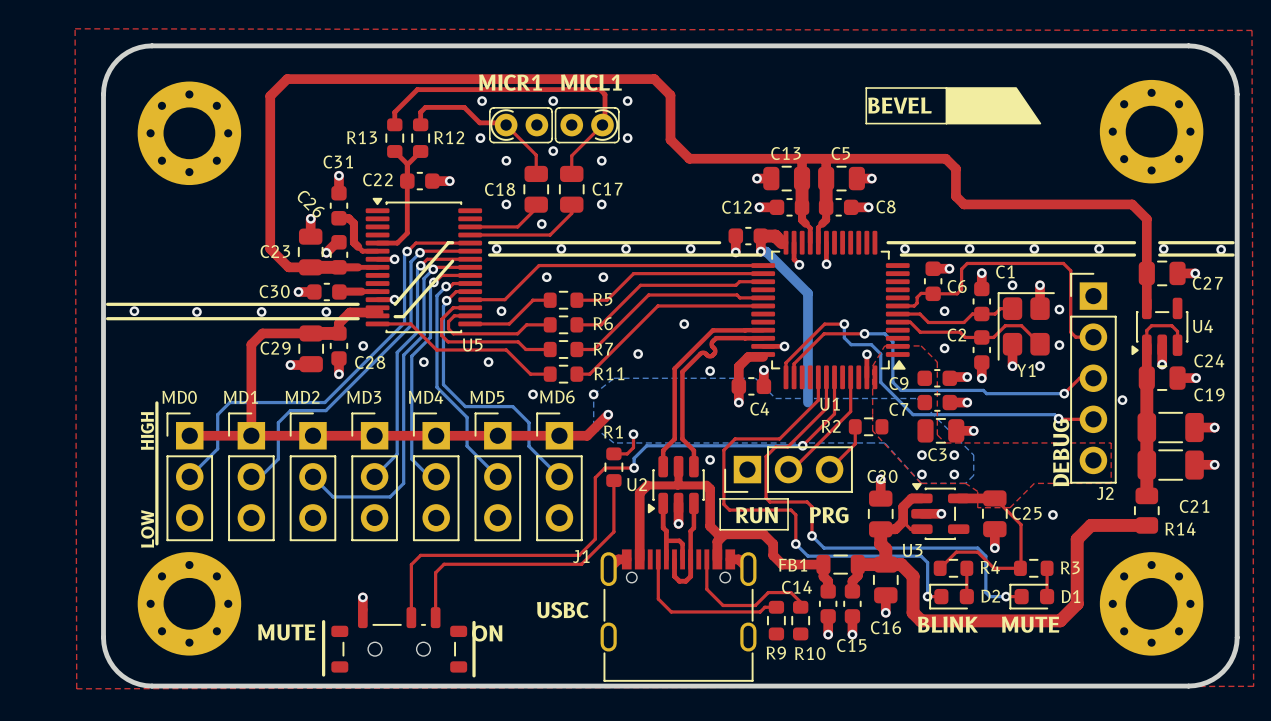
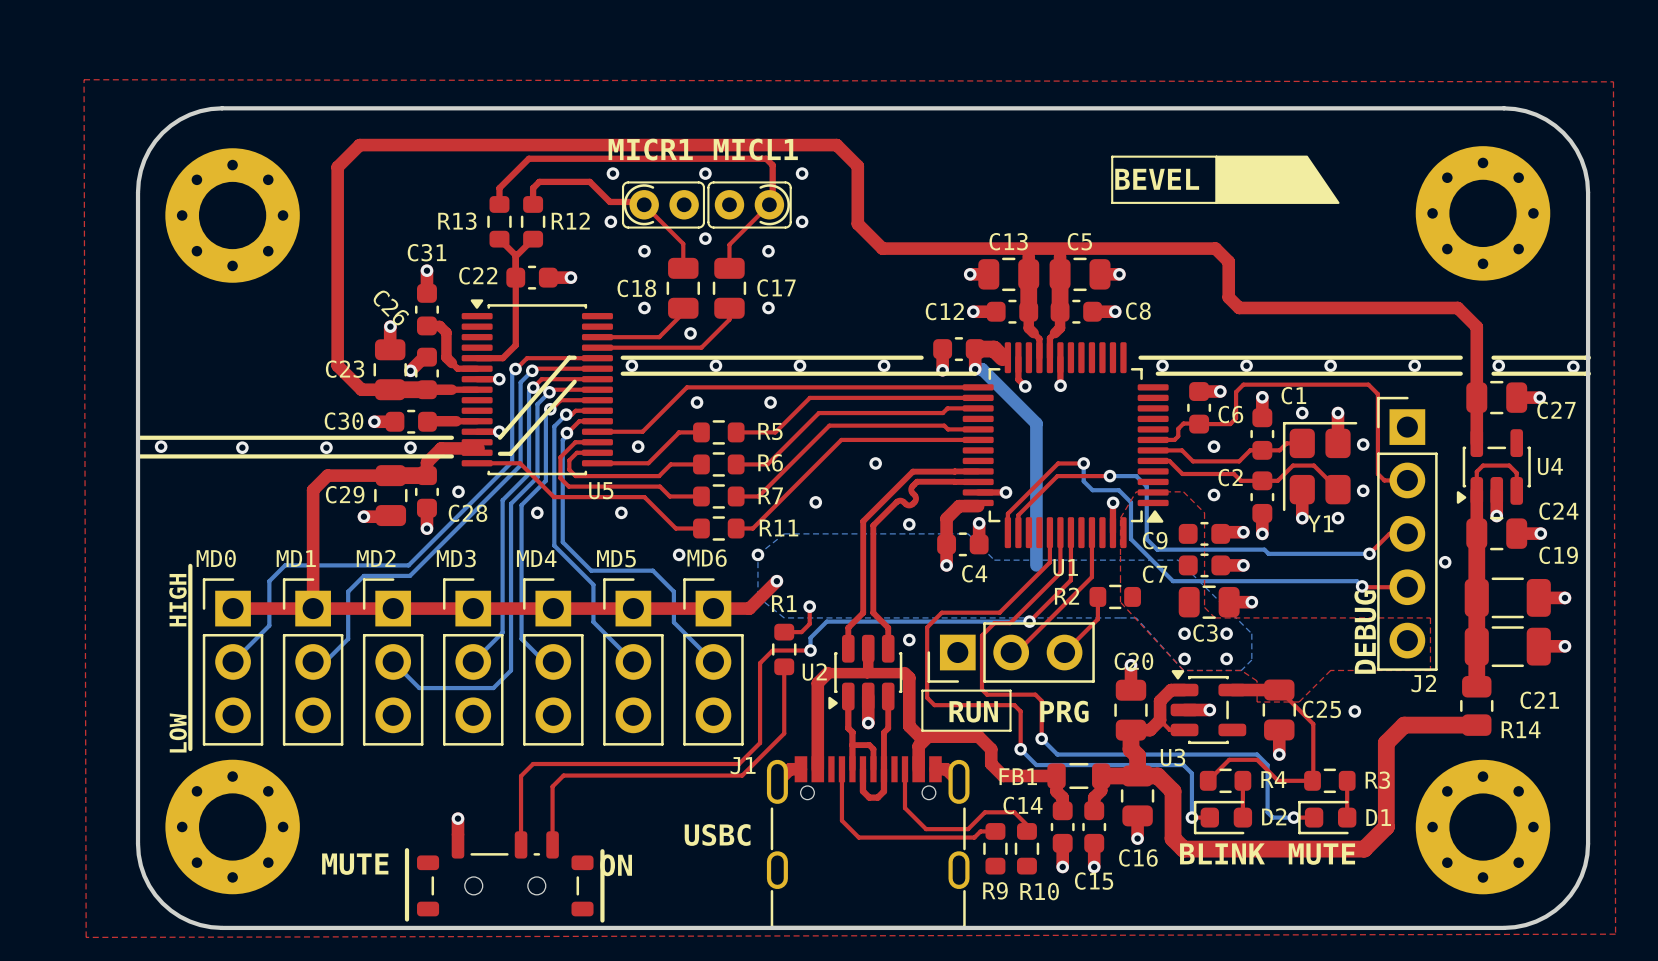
board edge: (152, 45) (1188, 45) (1201, 47) (1212, 52) (1222, 60) (1230, 70) (1235, 81) (1237, 94) (1237, 637) (1235, 650) (1230, 661) (1222, 671) (1212, 679) (1201, 684) (1188, 686) (152, 686) (139, 684) (127, 679) (117, 671) (109, 661) (105, 650) (103, 637) (103, 94) (107, 75) (117, 60) (133, 49) (152, 45) -> (222, 108) (189, 114) (162, 132) (144, 160) (138, 192) (138, 843) (140, 865) (149, 885) (162, 903) (180, 916) (200, 925) (222, 927) (1504, 927) (1525, 925) (1546, 916) (1563, 903) (1576, 885) (1585, 865) (1588, 843) (1588, 192) (1585, 170) (1576, 150) (1563, 132) (1546, 119) (1525, 111) (1504, 108) (222, 108)
line: (107, 304) (118, 304) -> none
line: (107, 318) (118, 318) -> none

